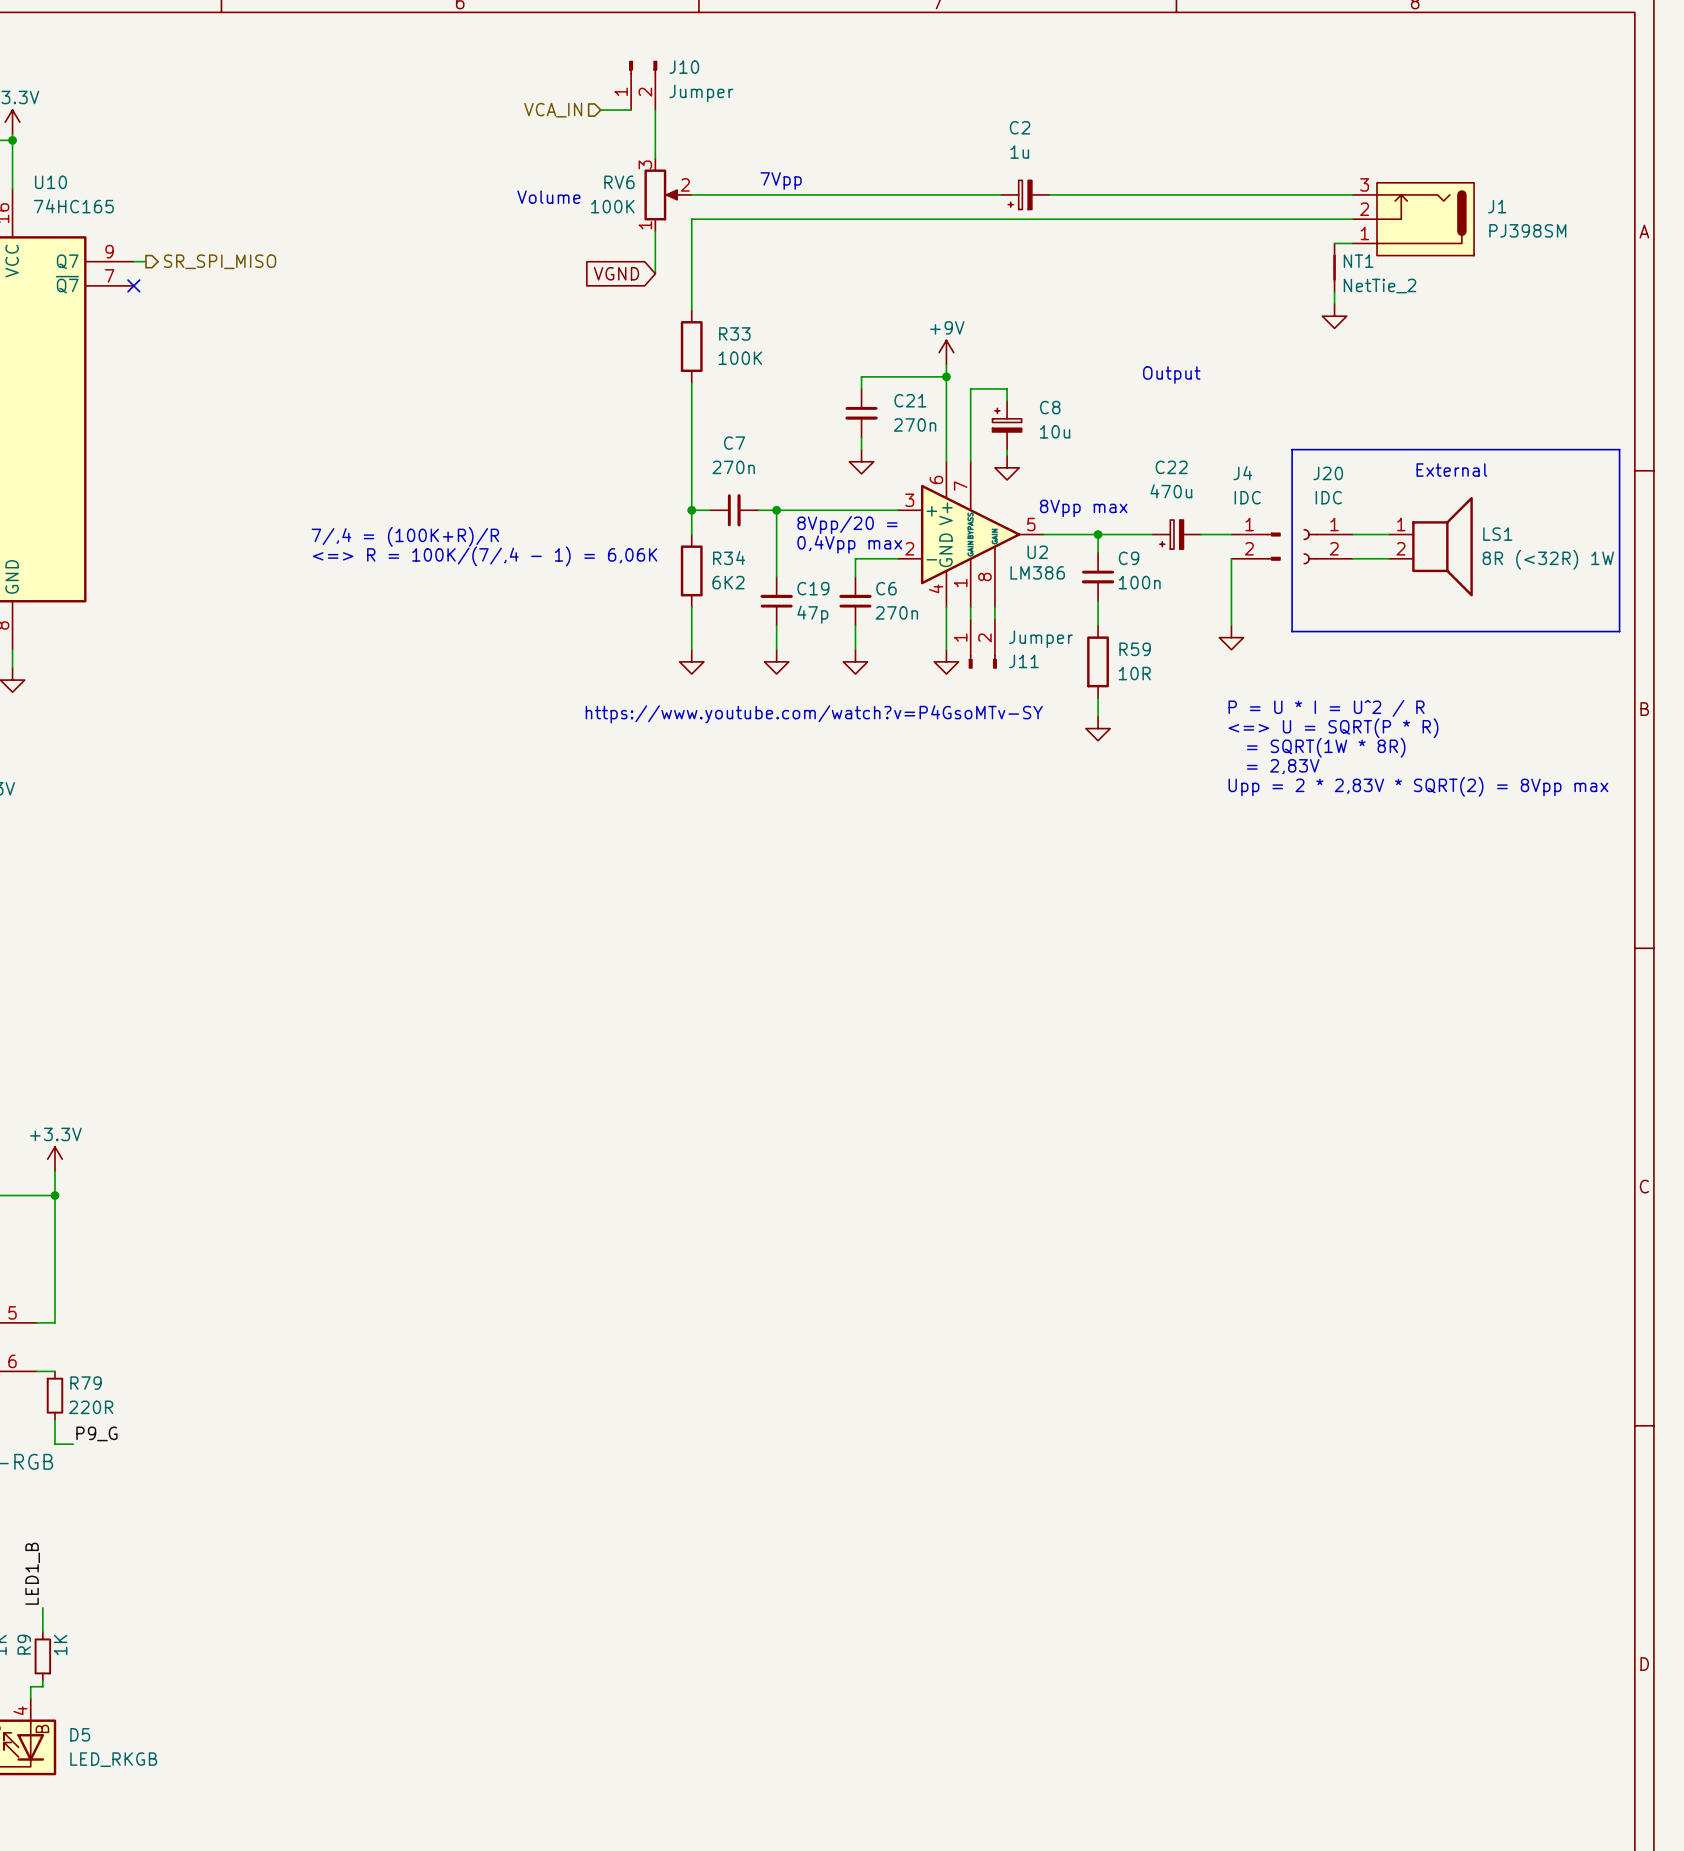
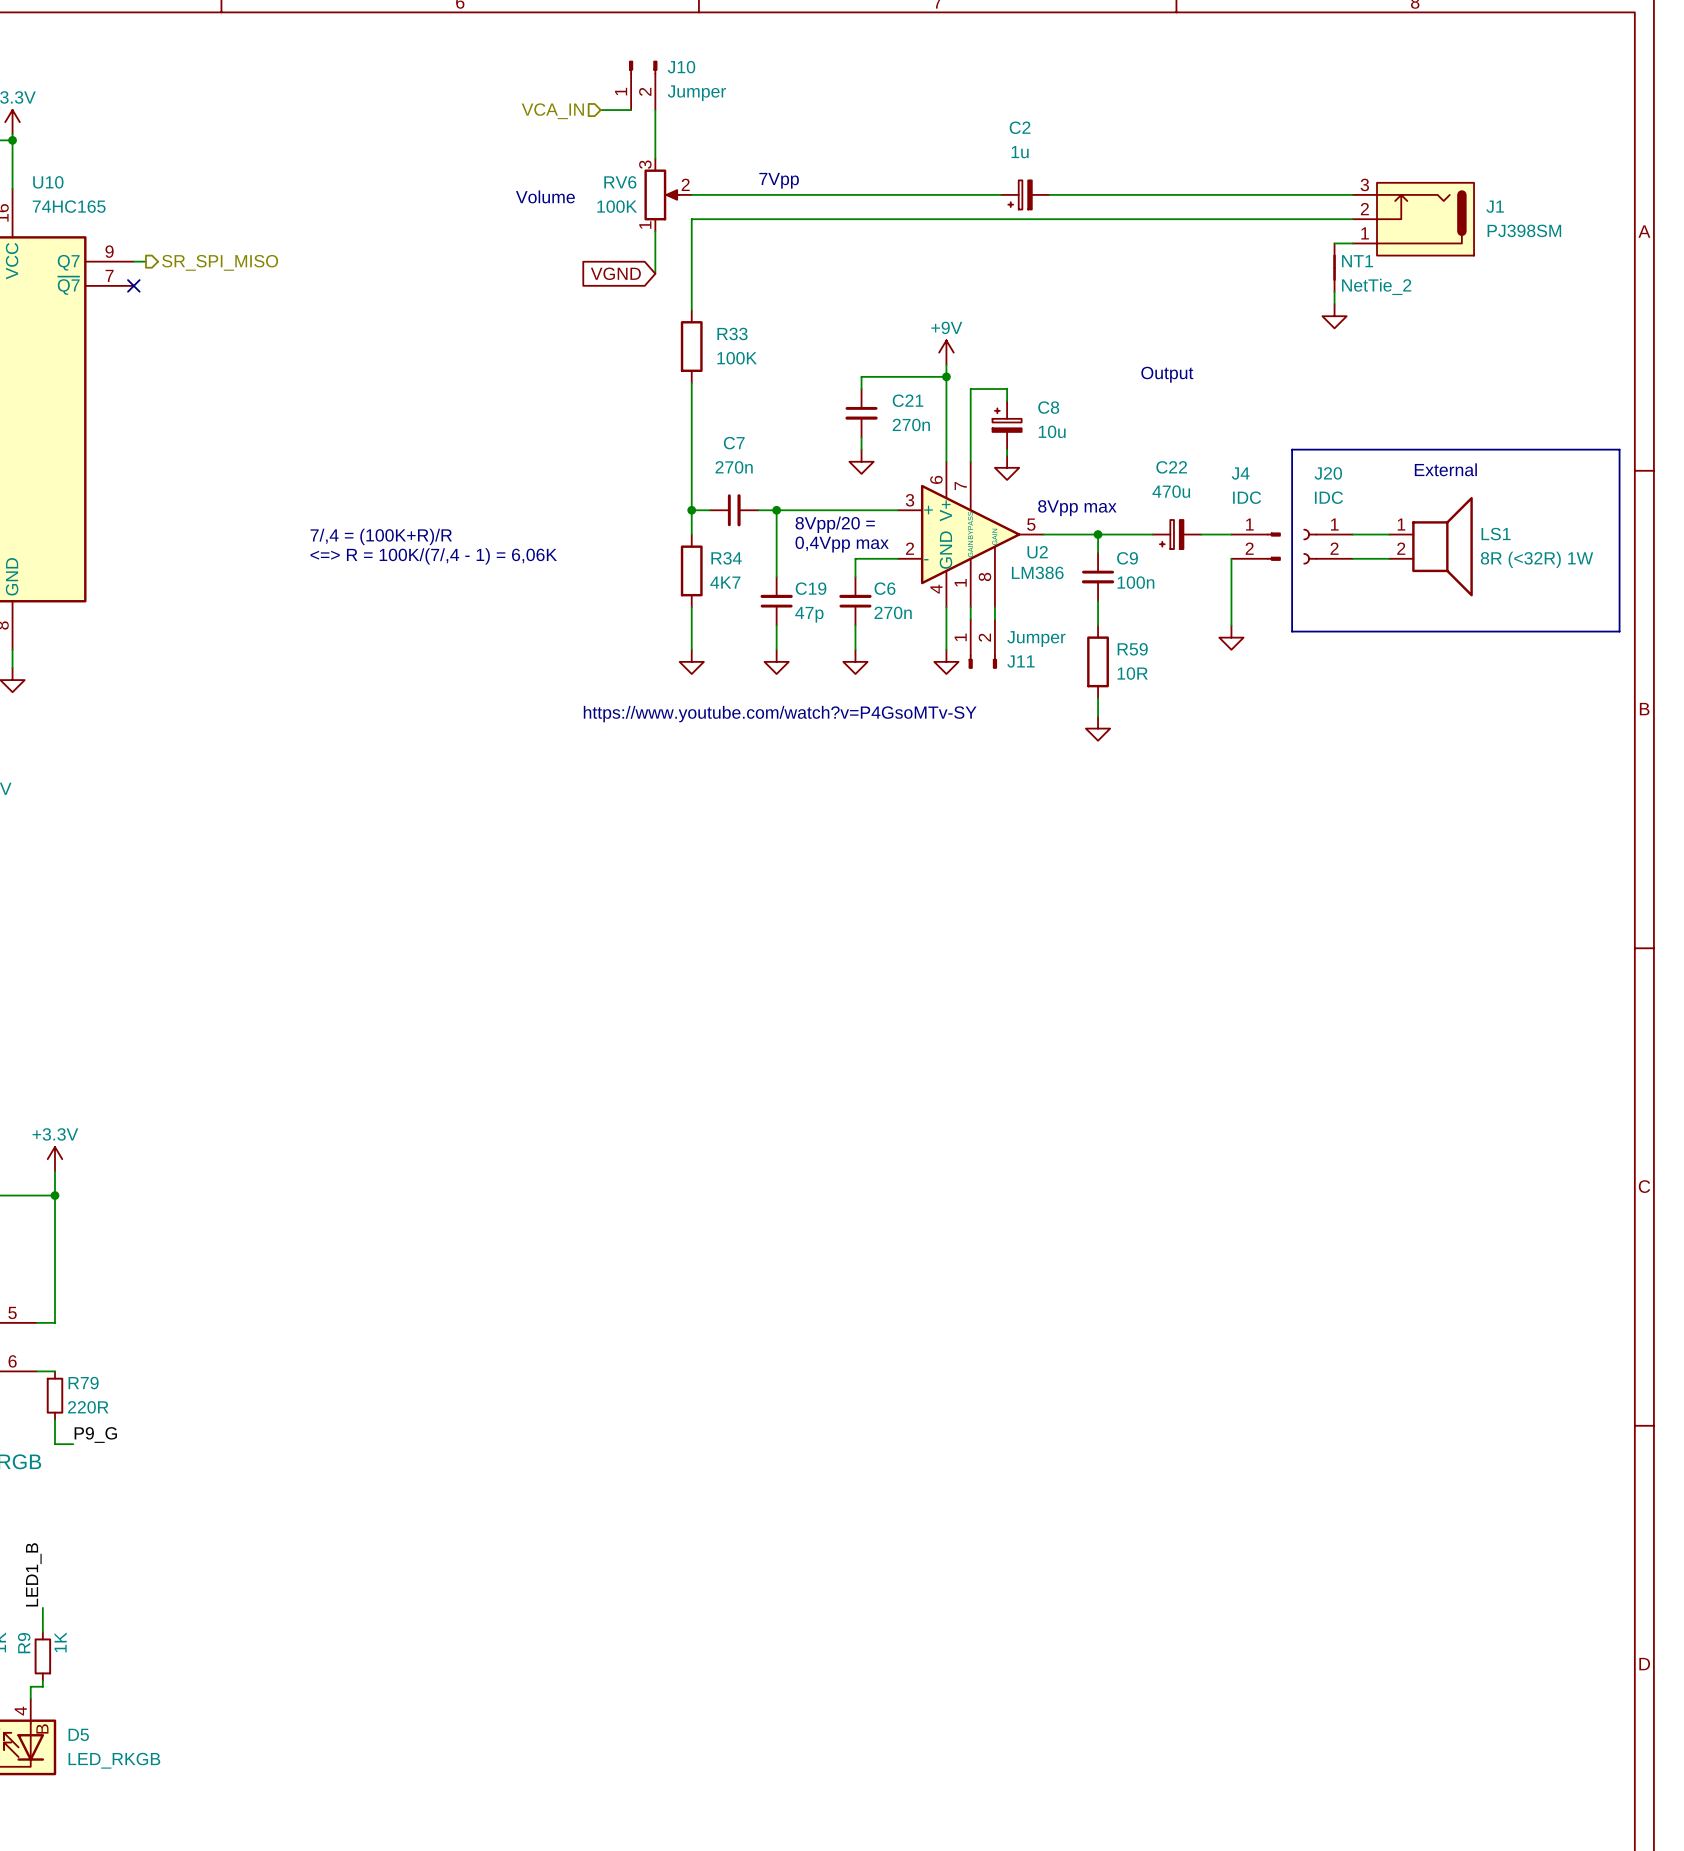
R34 value: 6K2 (728, 582) -> 4K7 (725, 582)
text: P = U * I = U^2 / R (1326, 708) -> none
text: <=> U = SQRT(P * R) (1333, 728) -> none
text: = SQRT(1W * 8R) (1326, 747) -> none
text: = 2,83V (1283, 766) -> none
text: Upp = 2 * 2,83V * SQRT(2) = 8Vpp max (1418, 786) -> none

